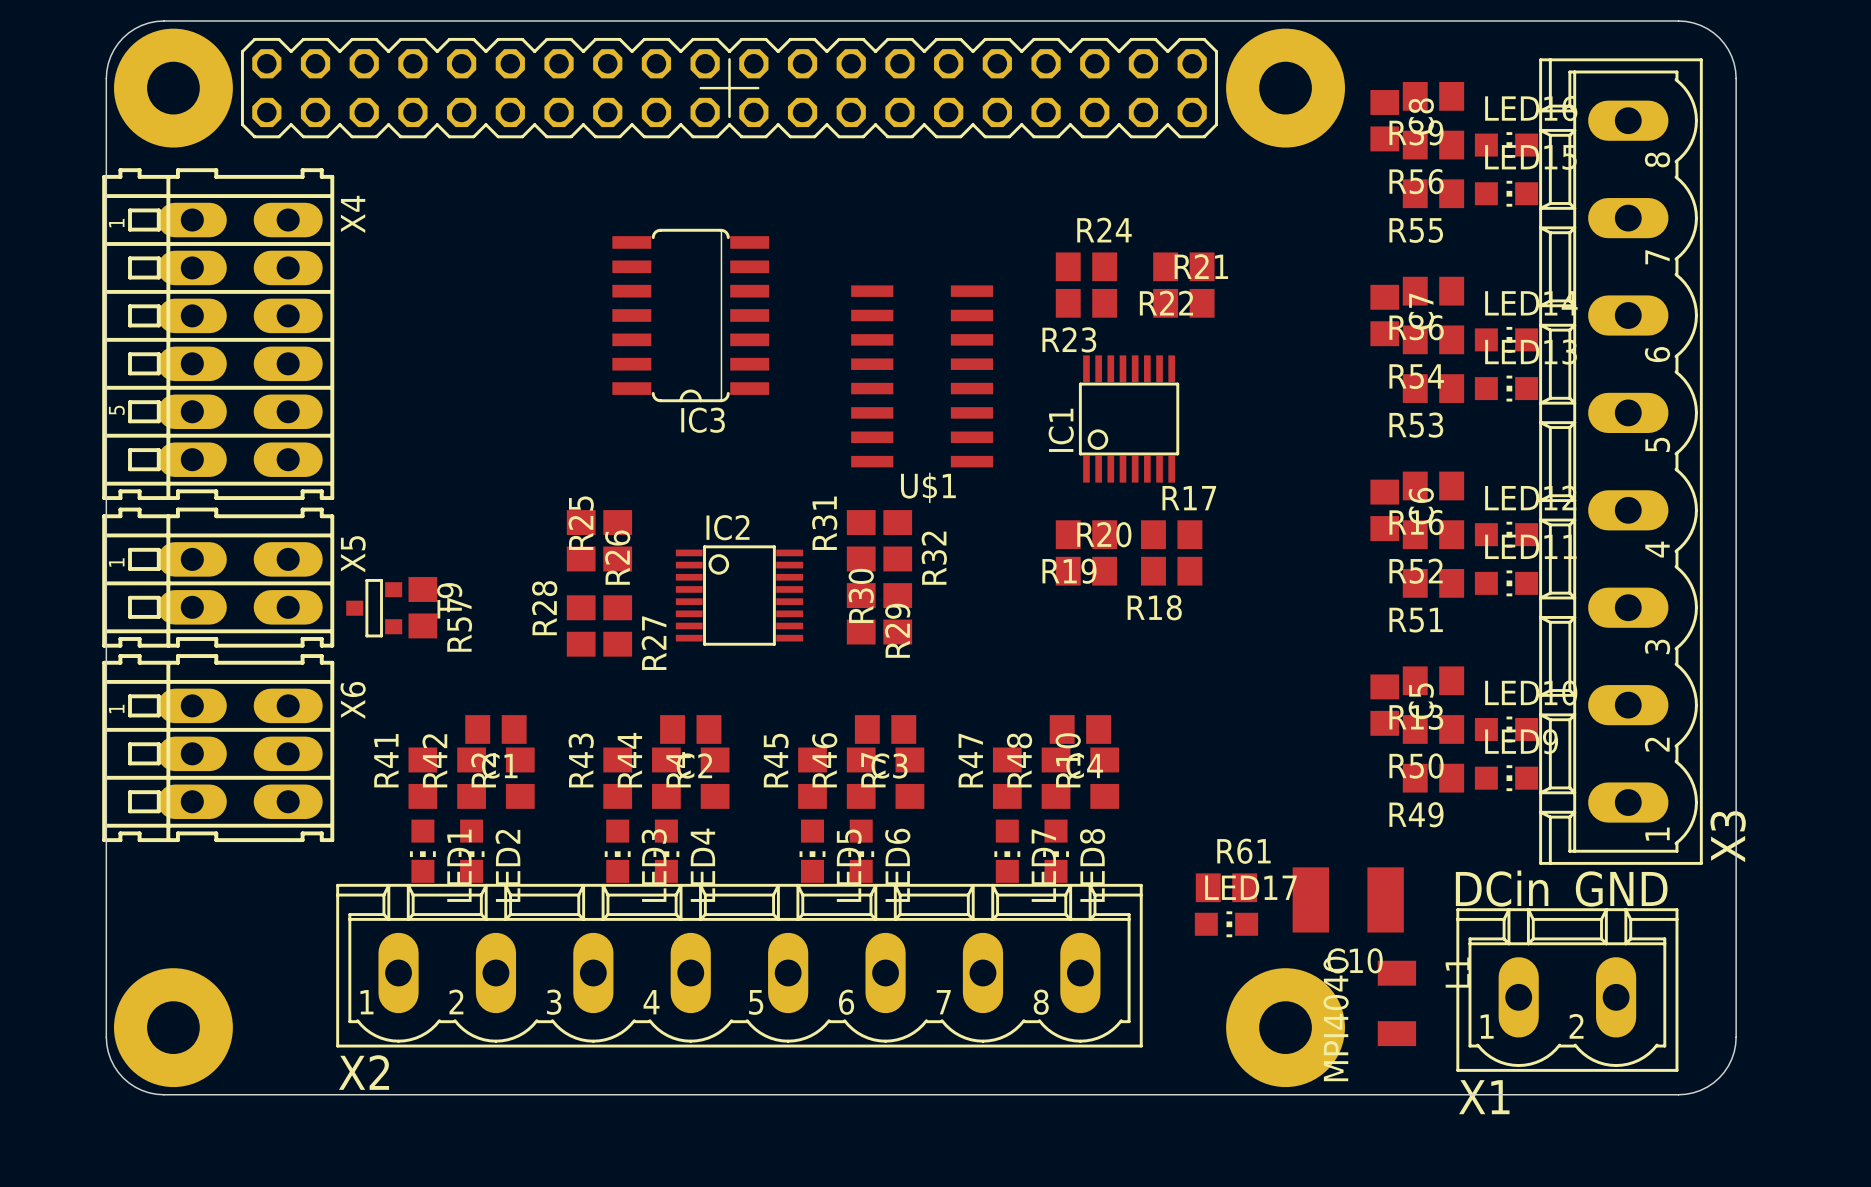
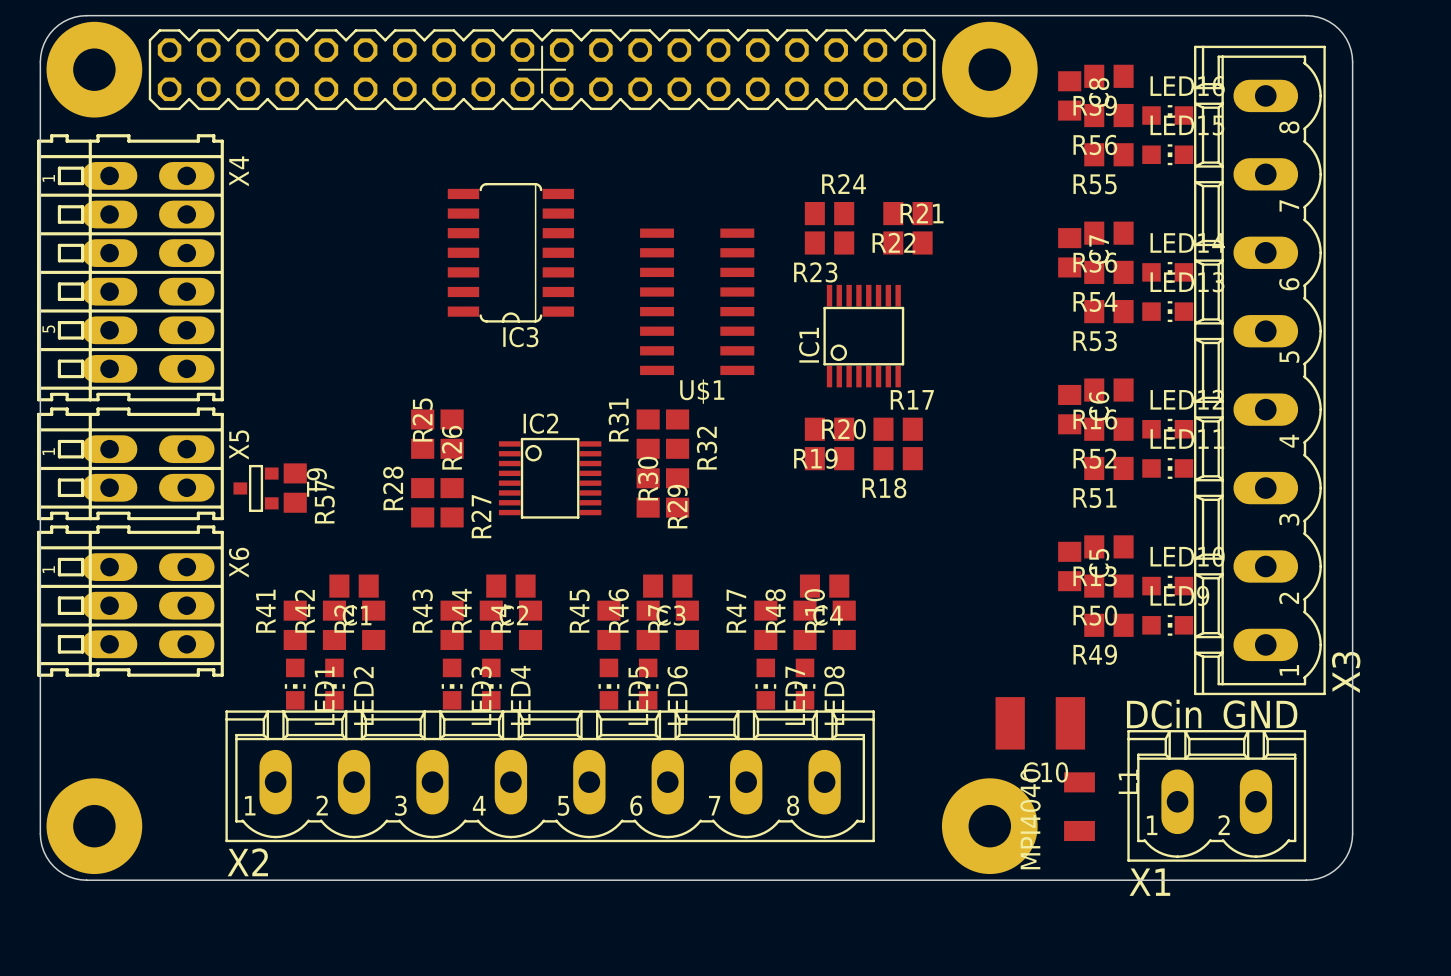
R61: (1226, 887) -> none
LED17: (1226, 924) -> none

